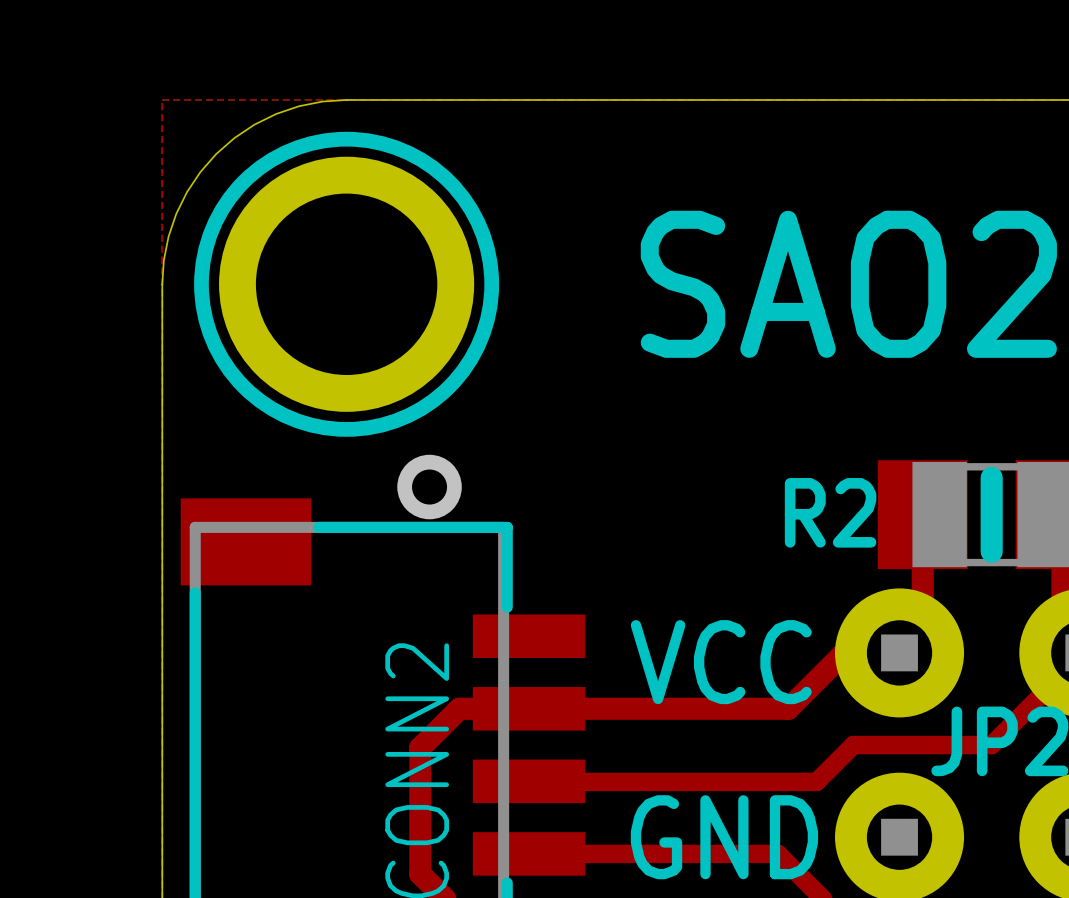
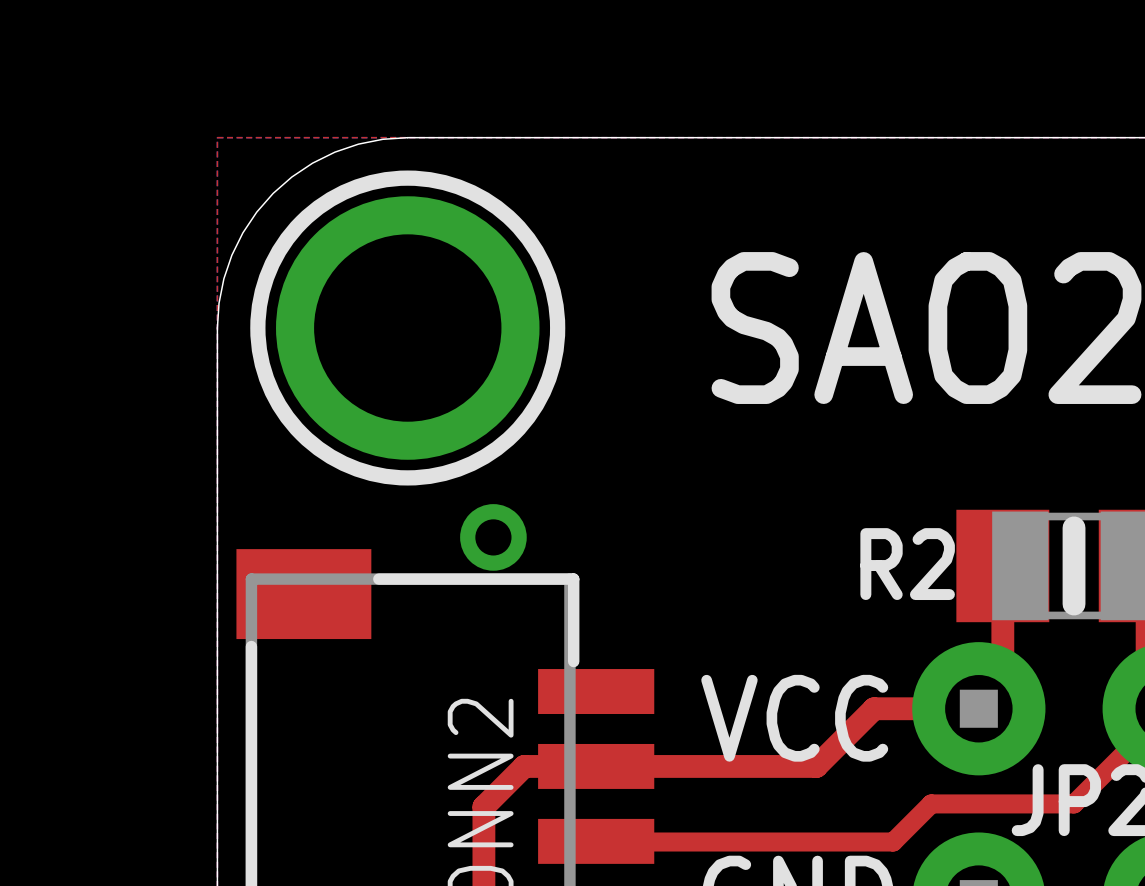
top track: (844, 652) (788, 708) (742, 708) -> (921, 708) (874, 708) (816, 766)

